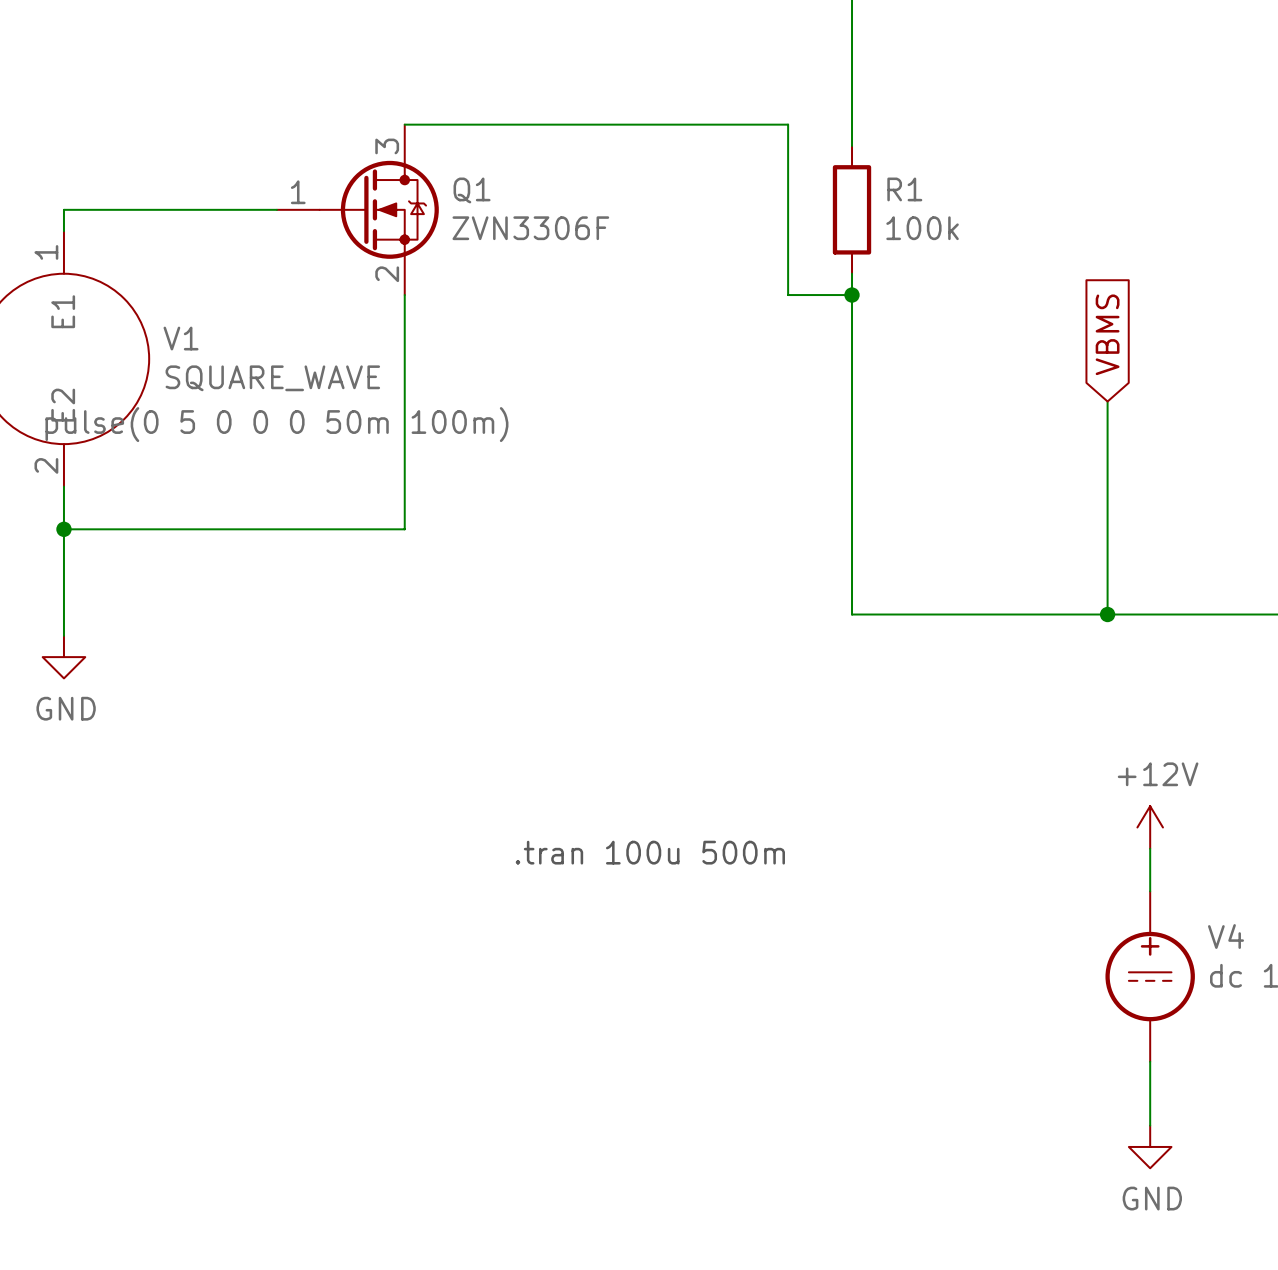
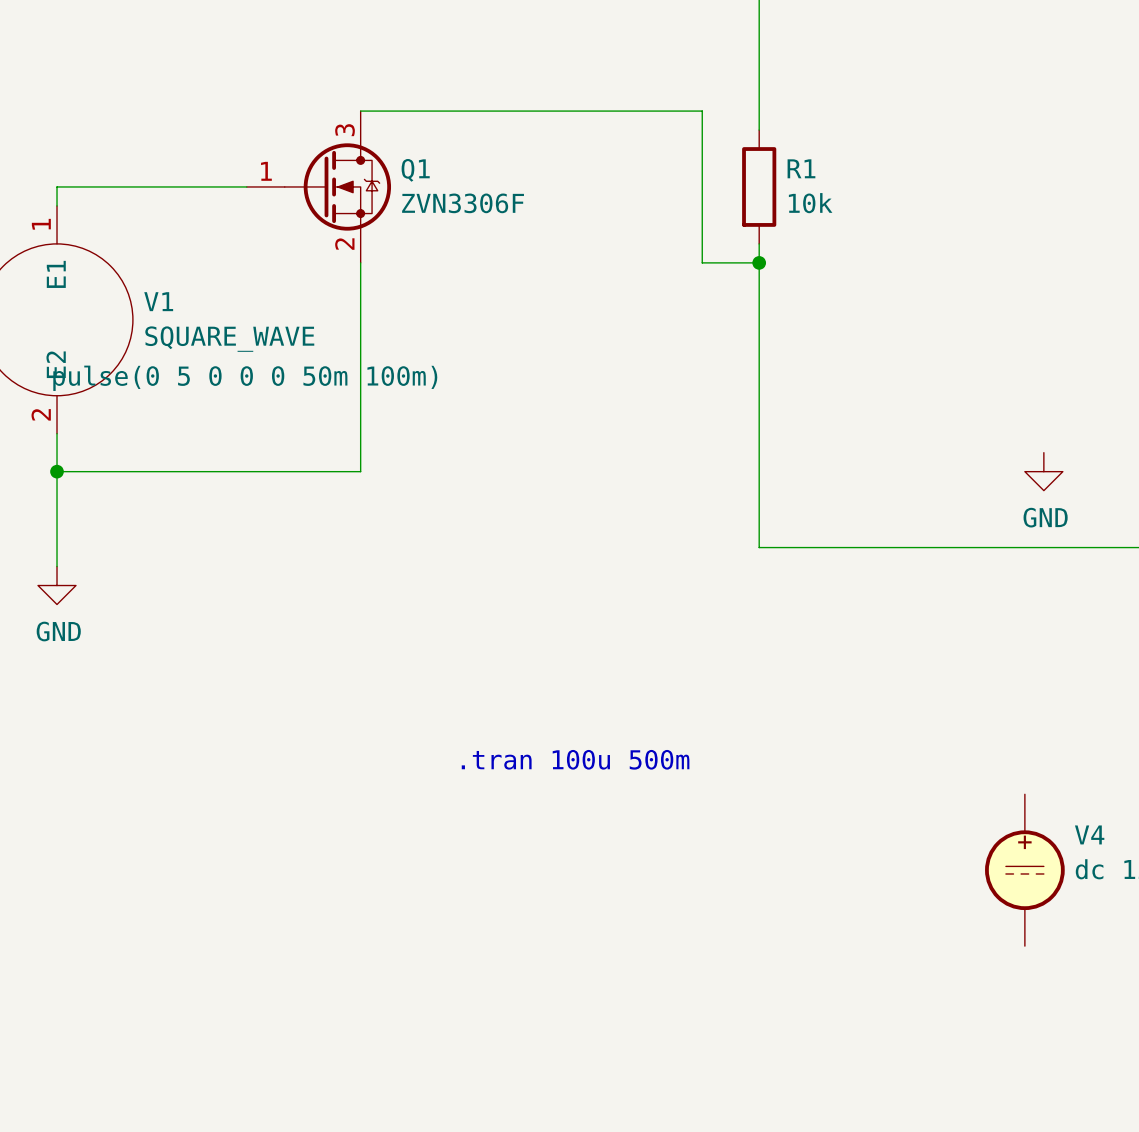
R1 value: 100k (922, 228) -> 10k (810, 203)
global label: VBMS (1107, 334) -> none
wire: (1107, 401) (1107, 614) -> none
power symbol: none -> GND (1043, 471)
junction: (1107, 614) -> none
power symbol: +12V (1150, 827) -> none
wire: (1150, 848) (1150, 891) -> none
wire: (1150, 1061) (1150, 1125) -> none
power symbol: GND (1150, 1146) -> none

